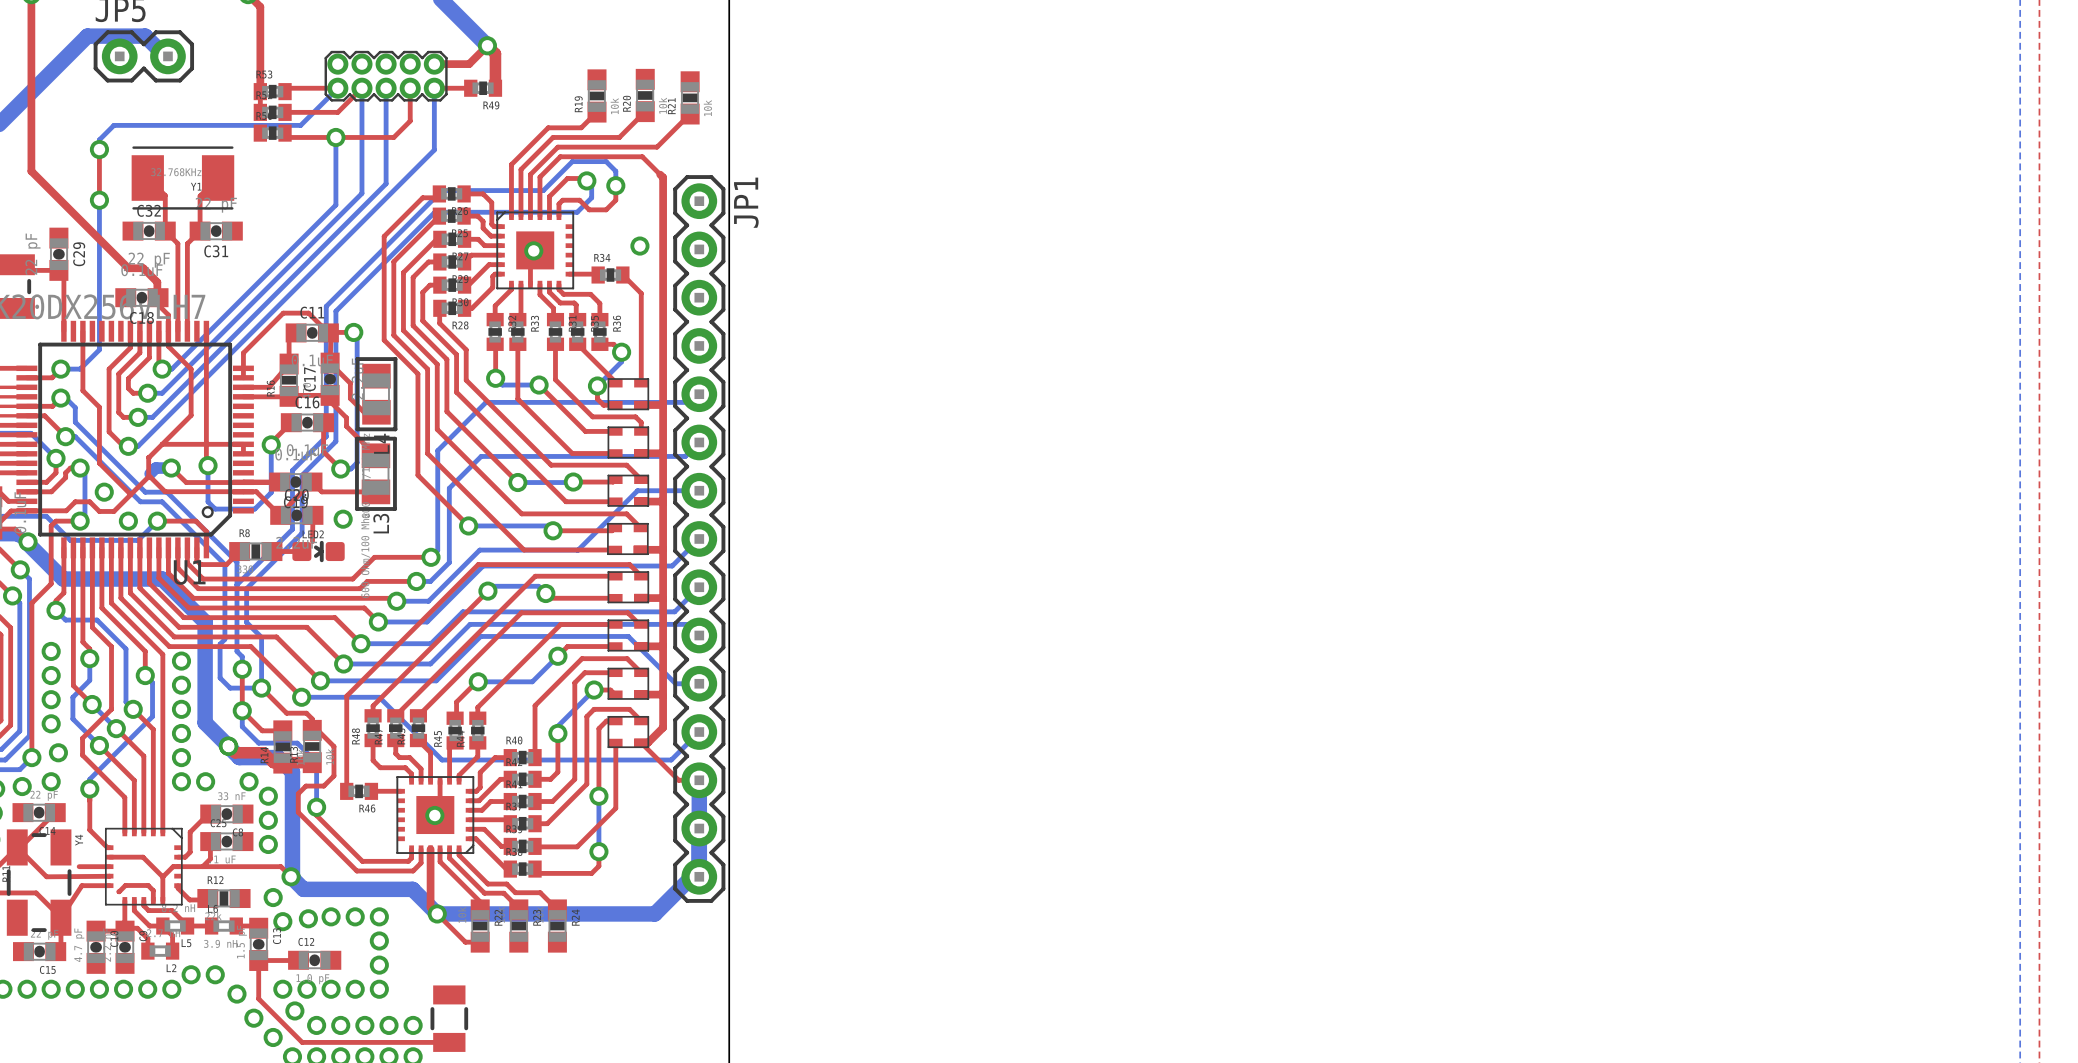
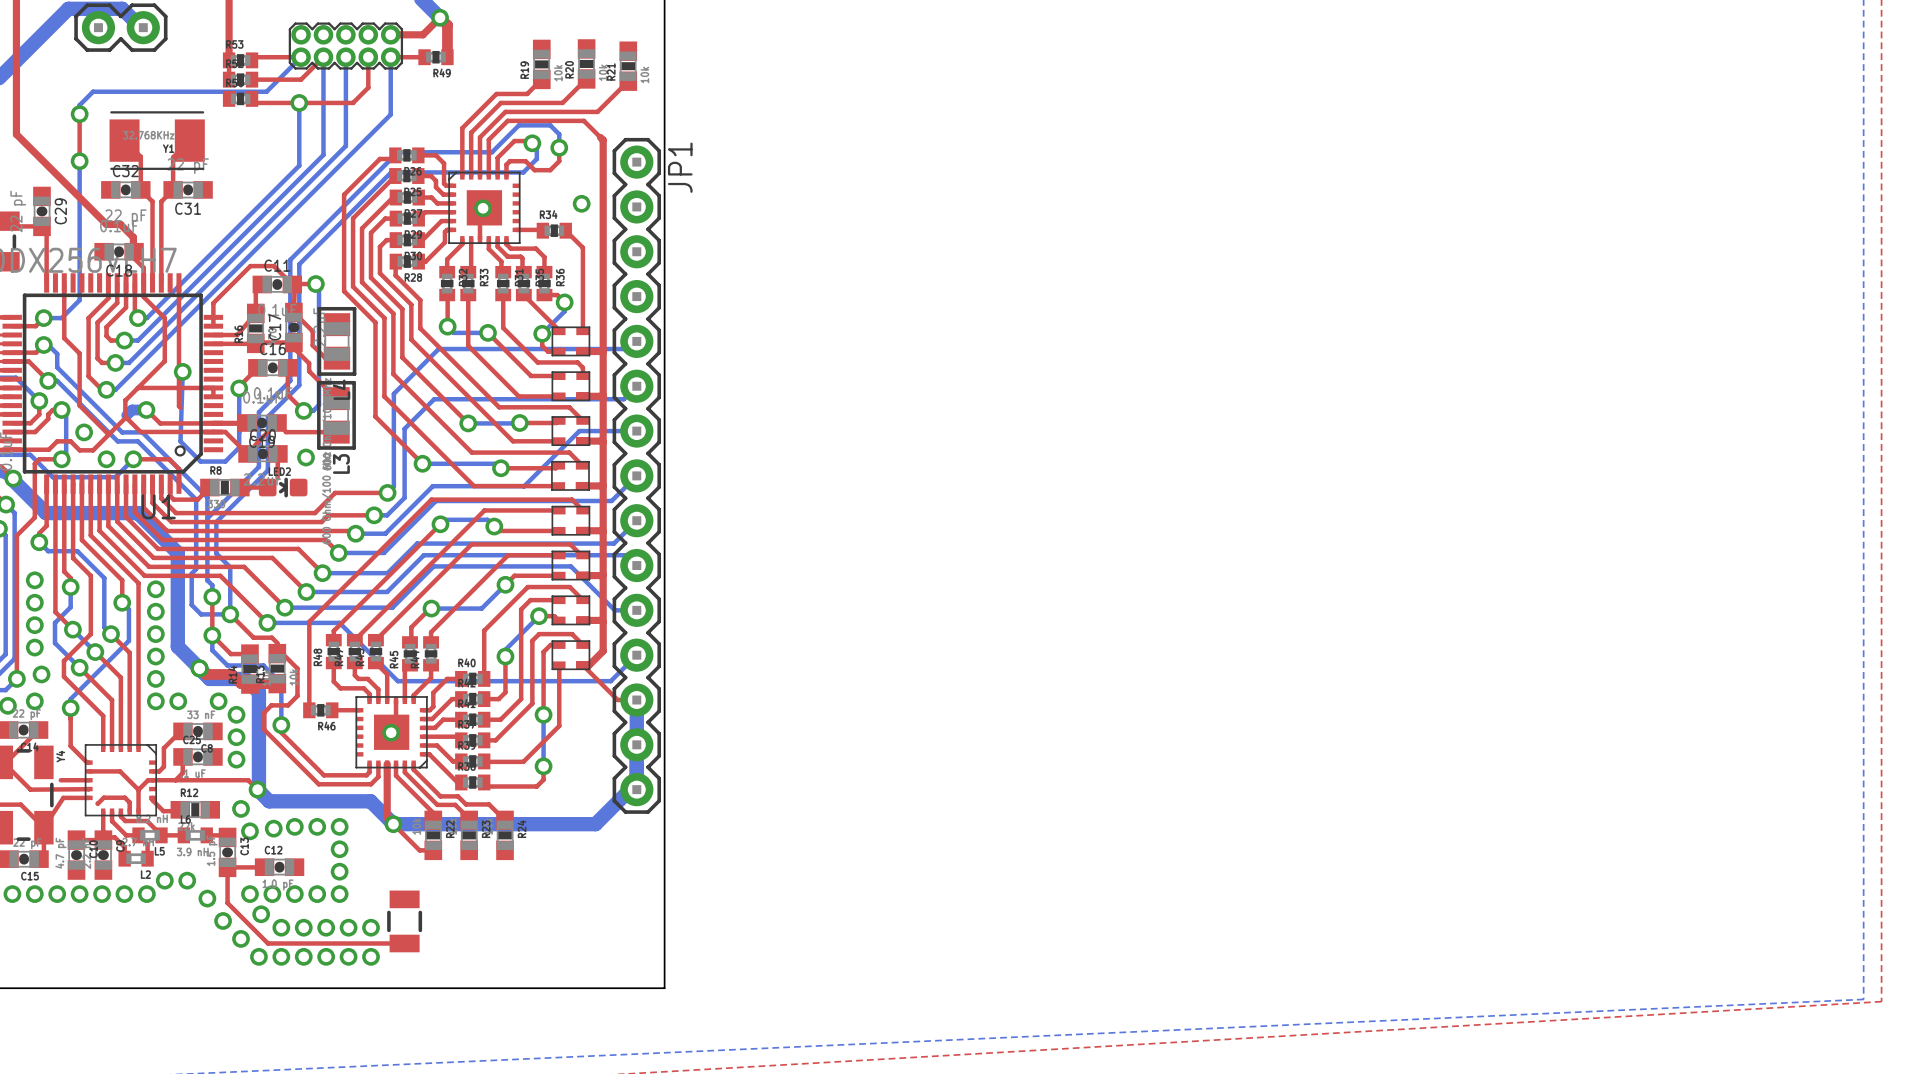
bottom track: (208, 465) (208, 501) -> (182, 371) (180, 441)
via position: (208, 465) -> (182, 371)
bottom track: (271, 492) (254, 509) (215, 509) -> (239, 432) (239, 447) (225, 461) (200, 461) (187, 448)

